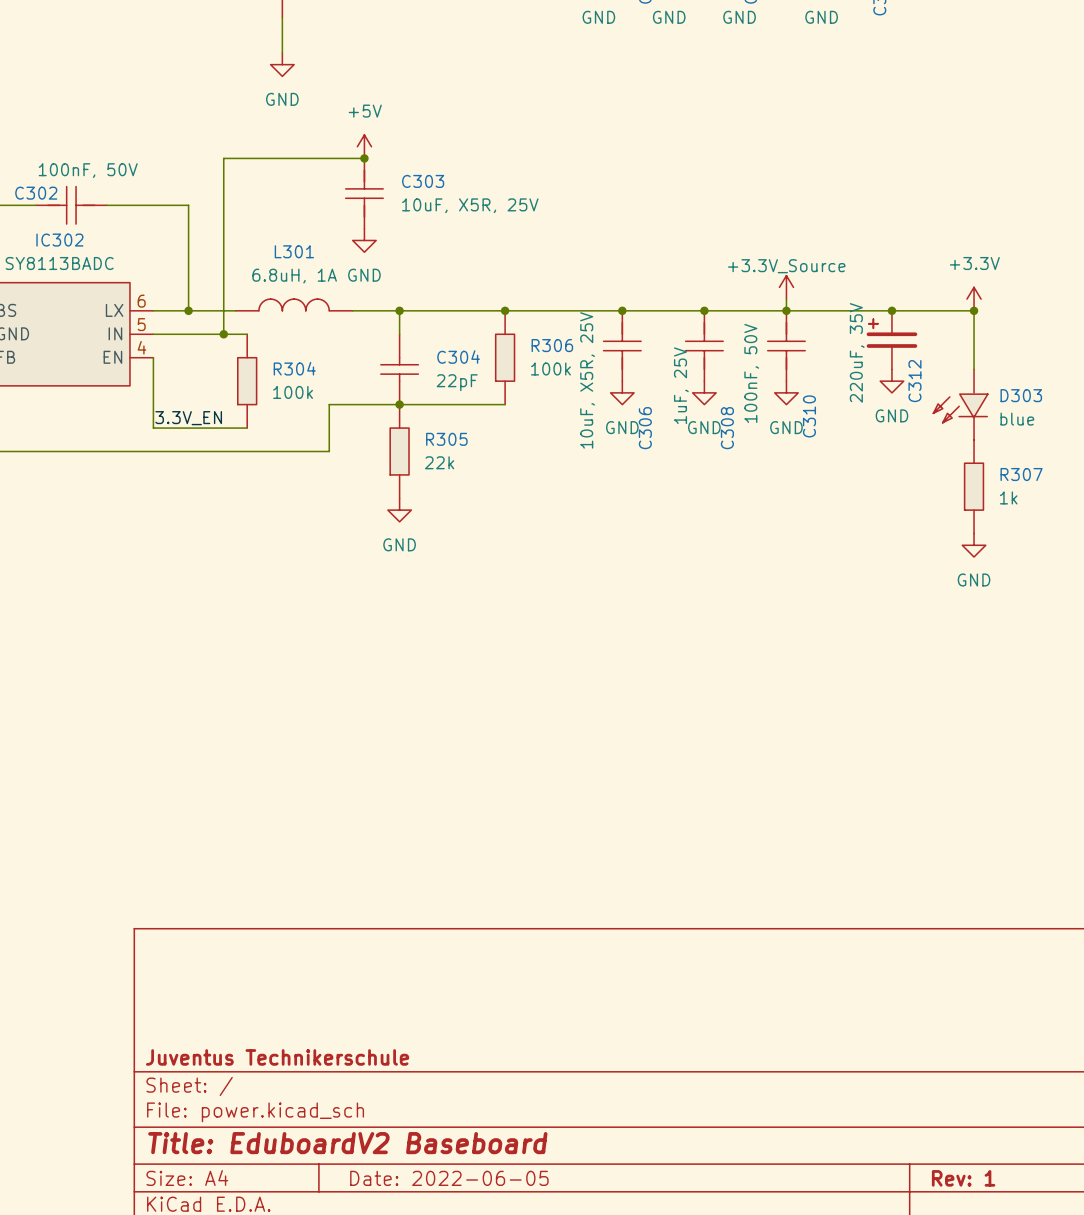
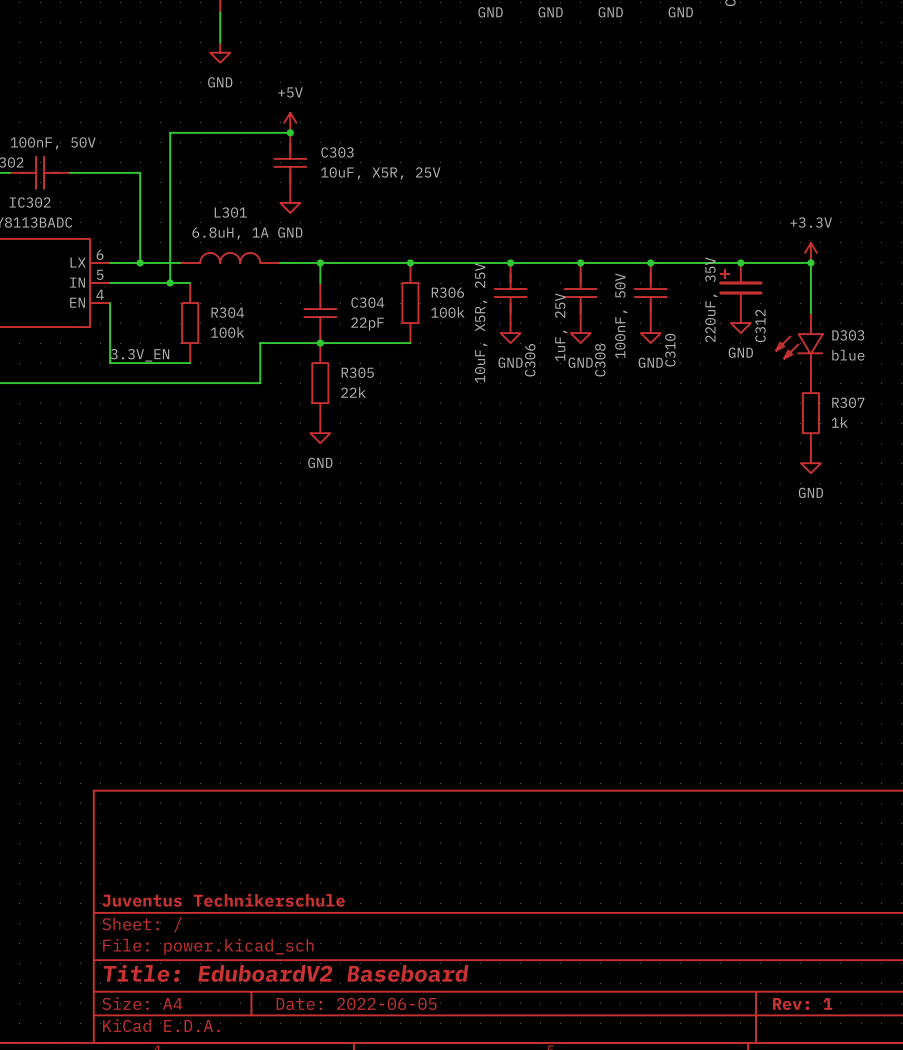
power symbol: +3.3V_Source (786, 287) -> none
wire: (786, 299) (786, 310) -> none

